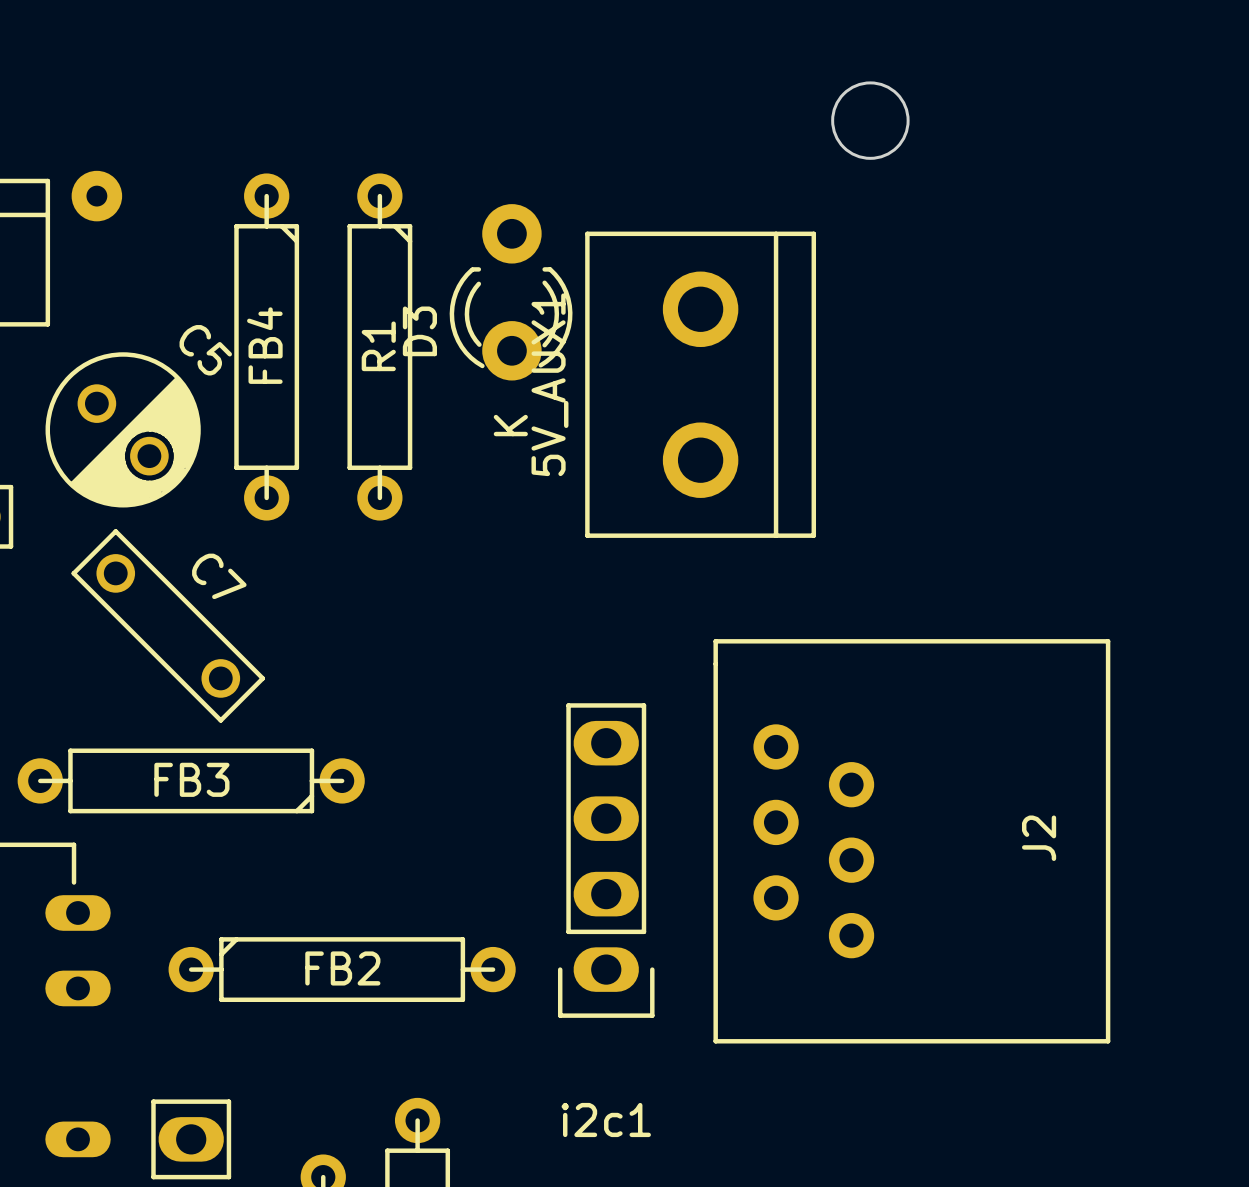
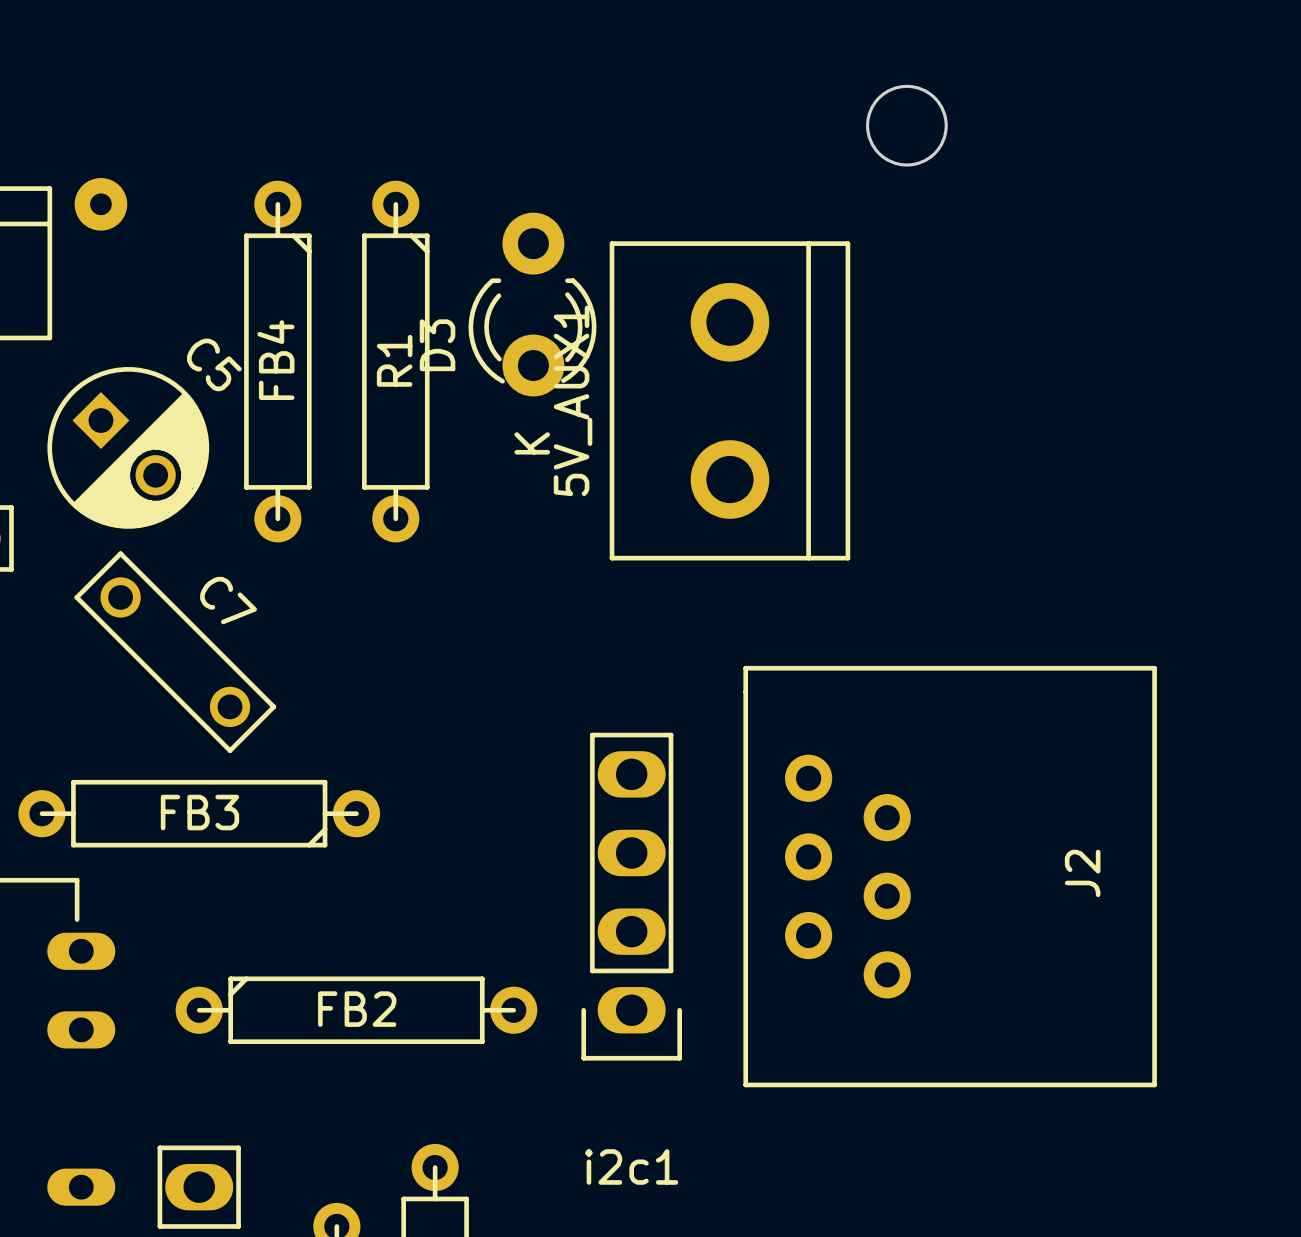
C5 footprint: [45, 352, 201, 508] -> [47, 367, 210, 529]

